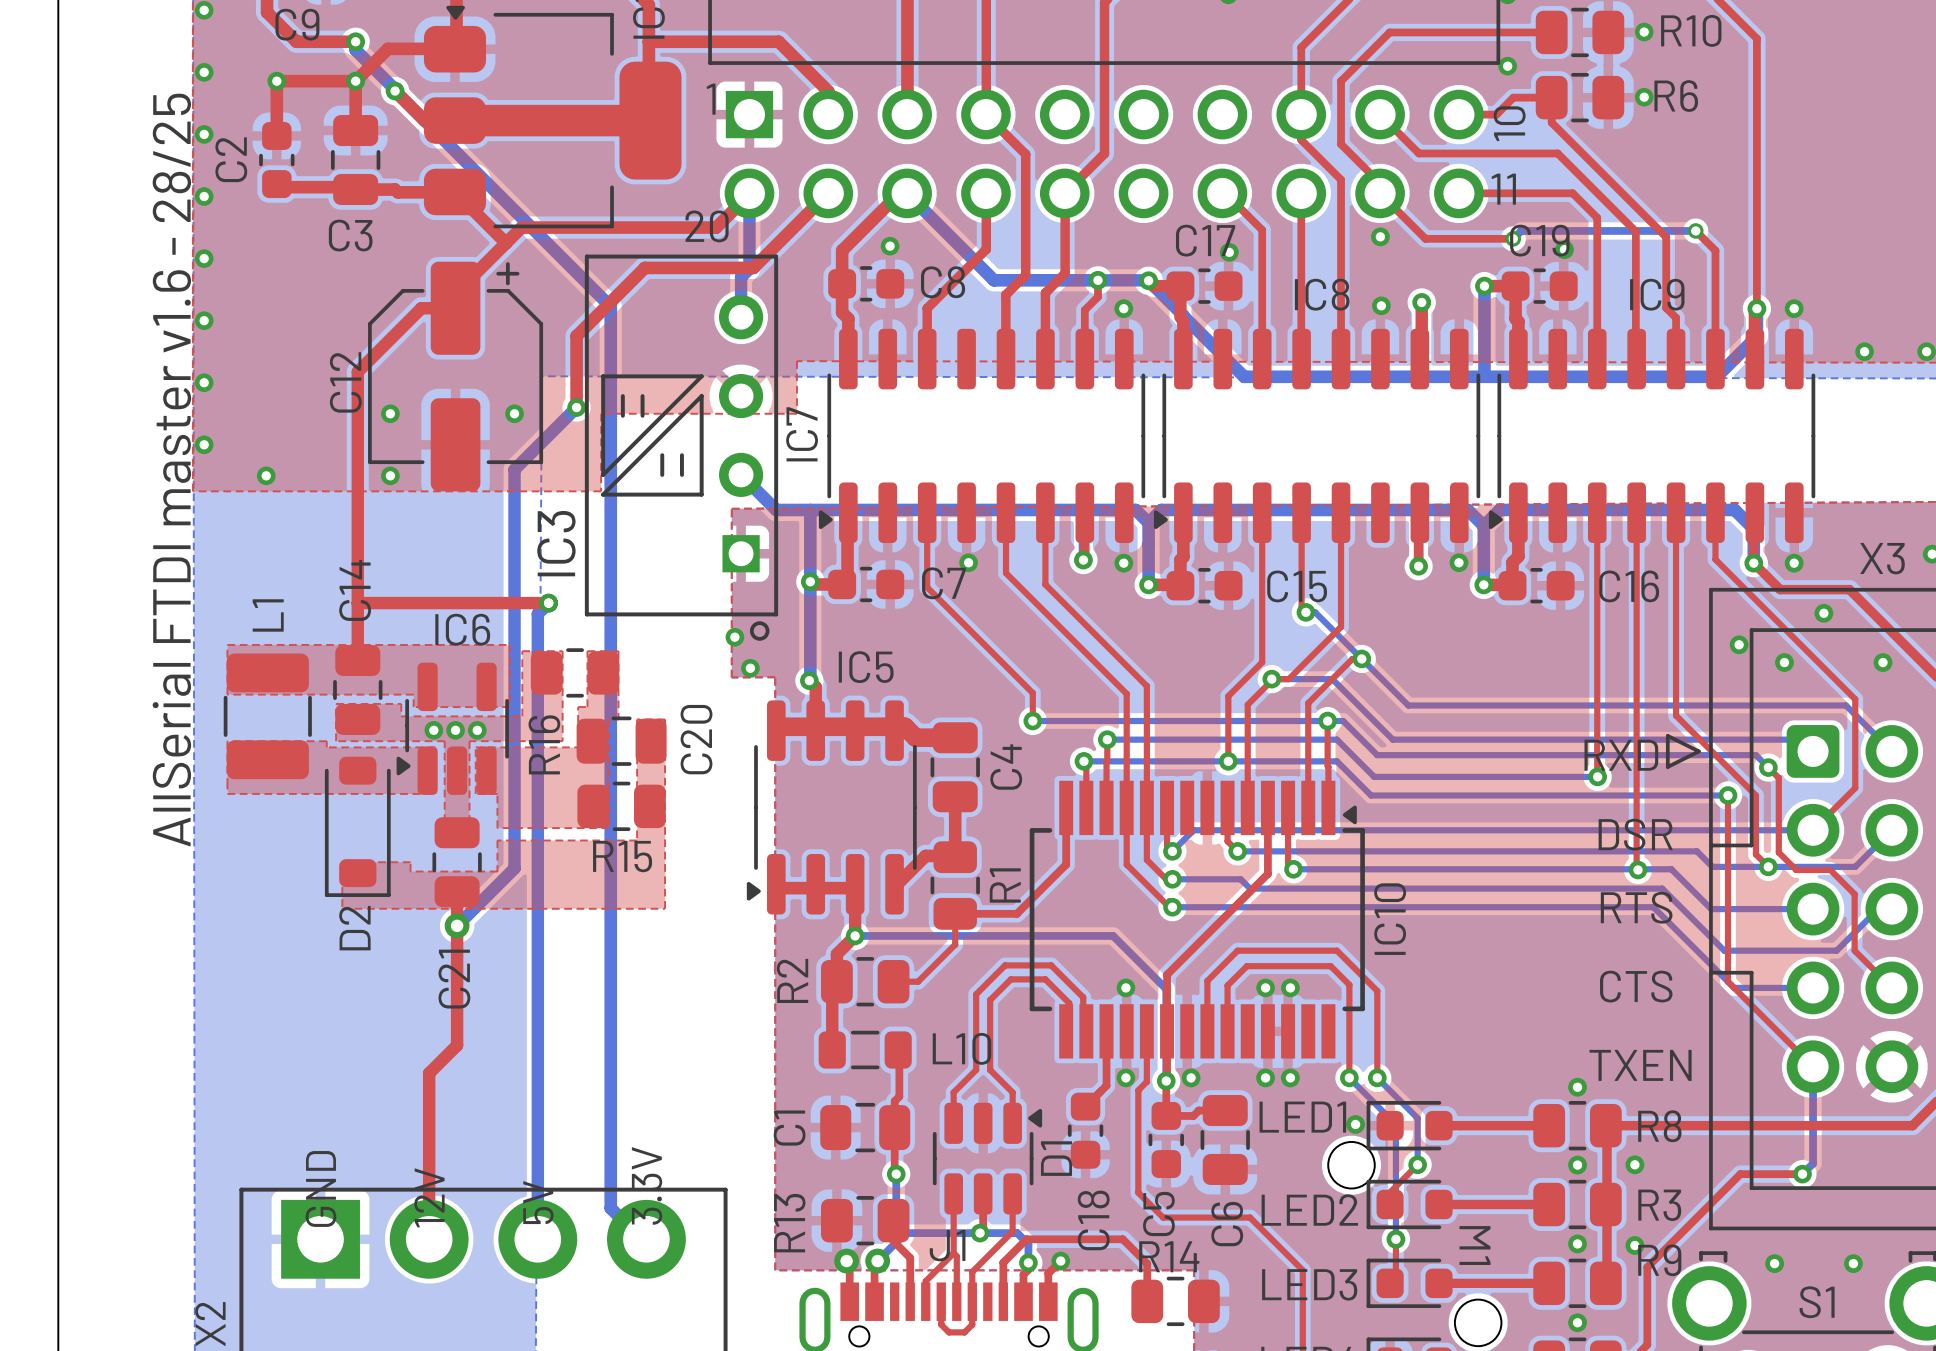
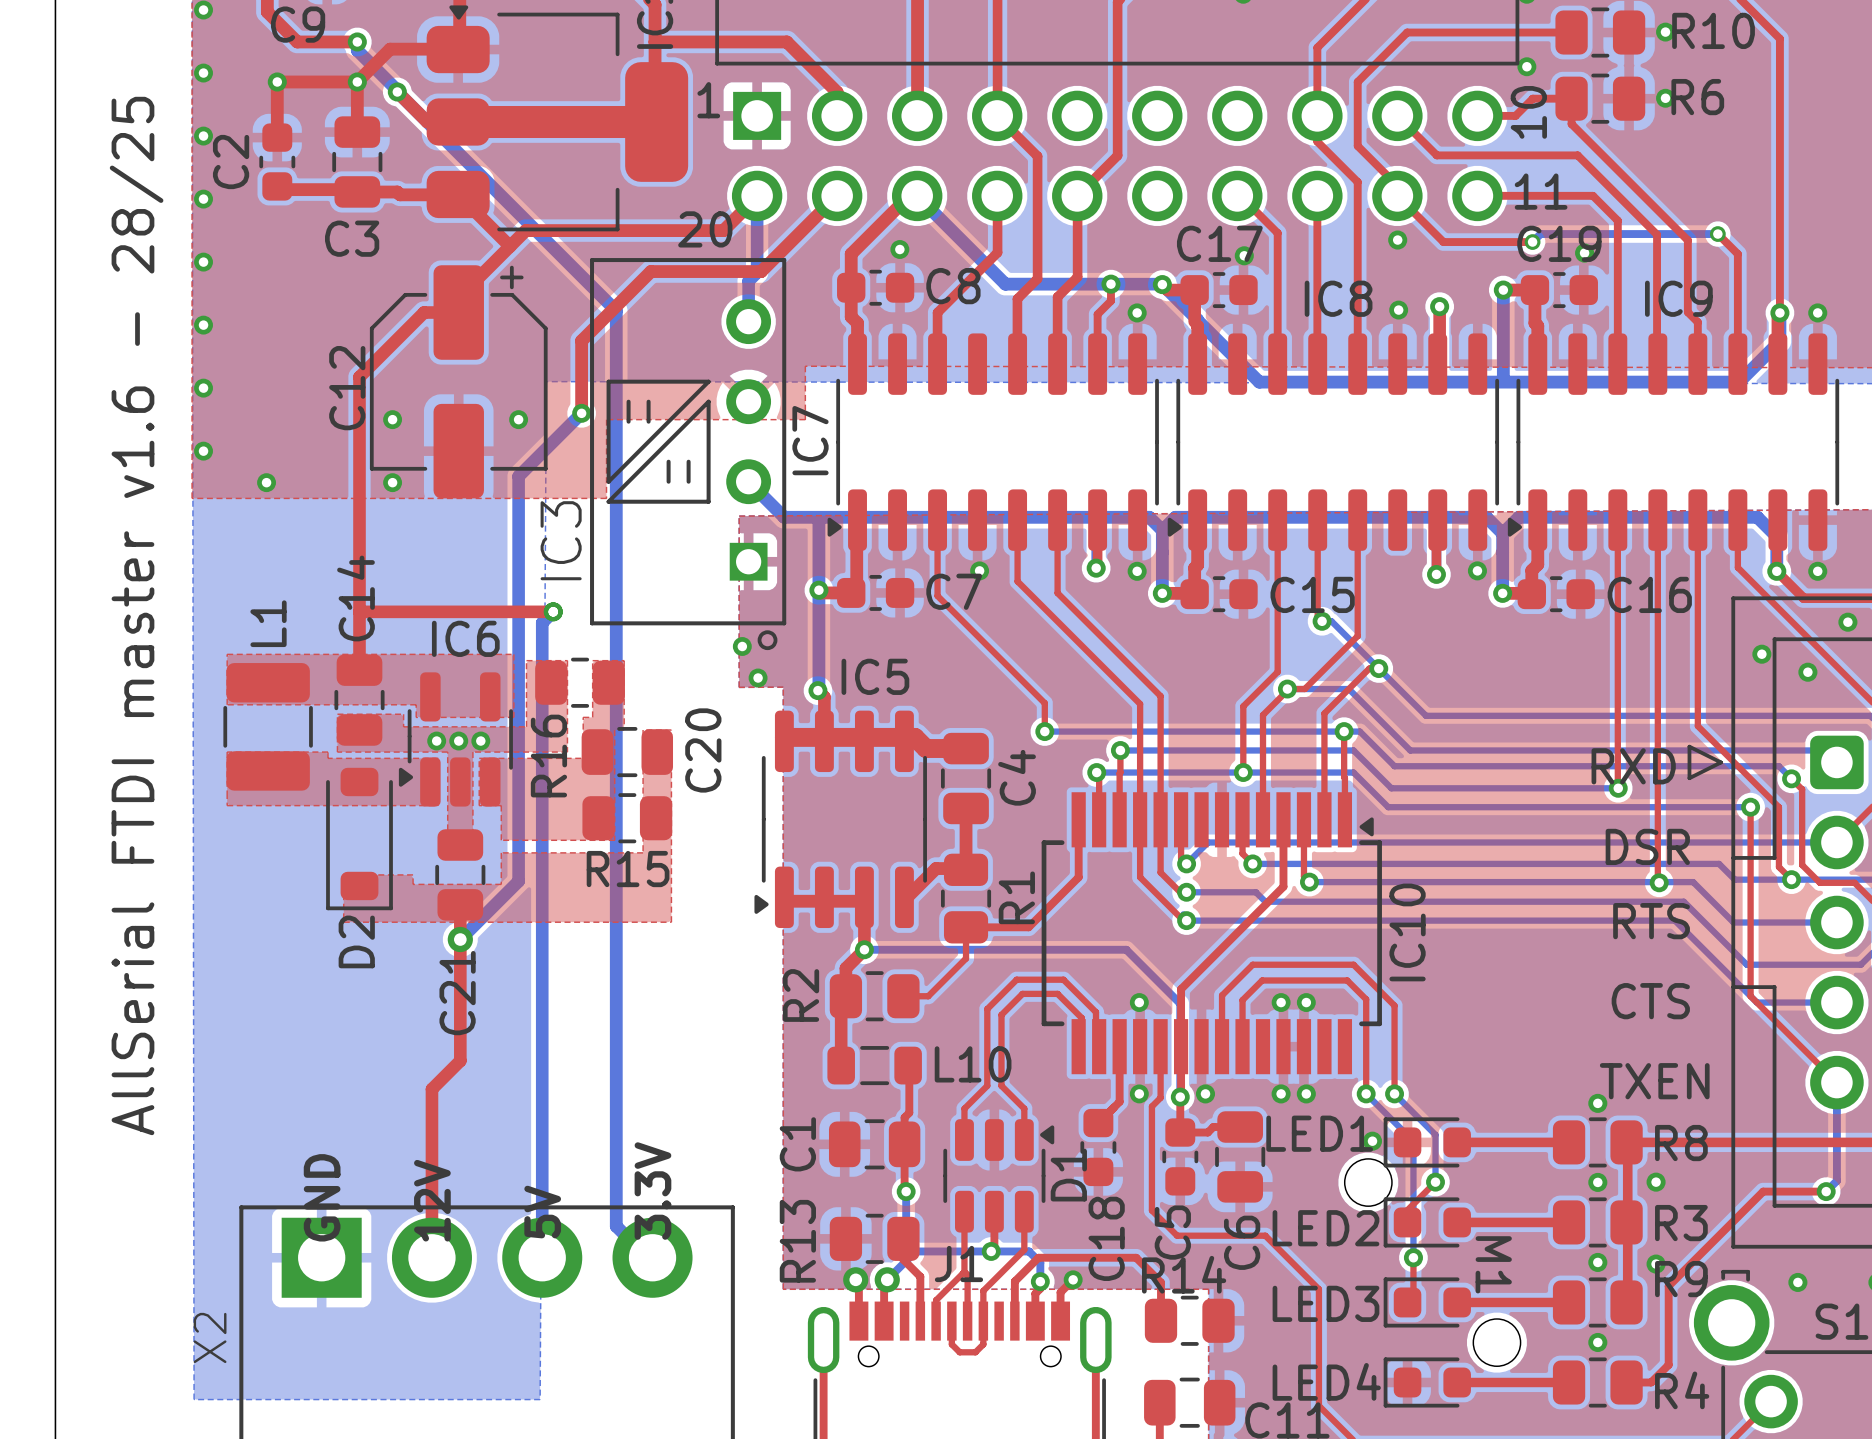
text position: AllSerial FTDI master v1.6 - 28/25 (171, 470) -> AllSerial FTDI master v1.6 - 28/25 (136, 615)

